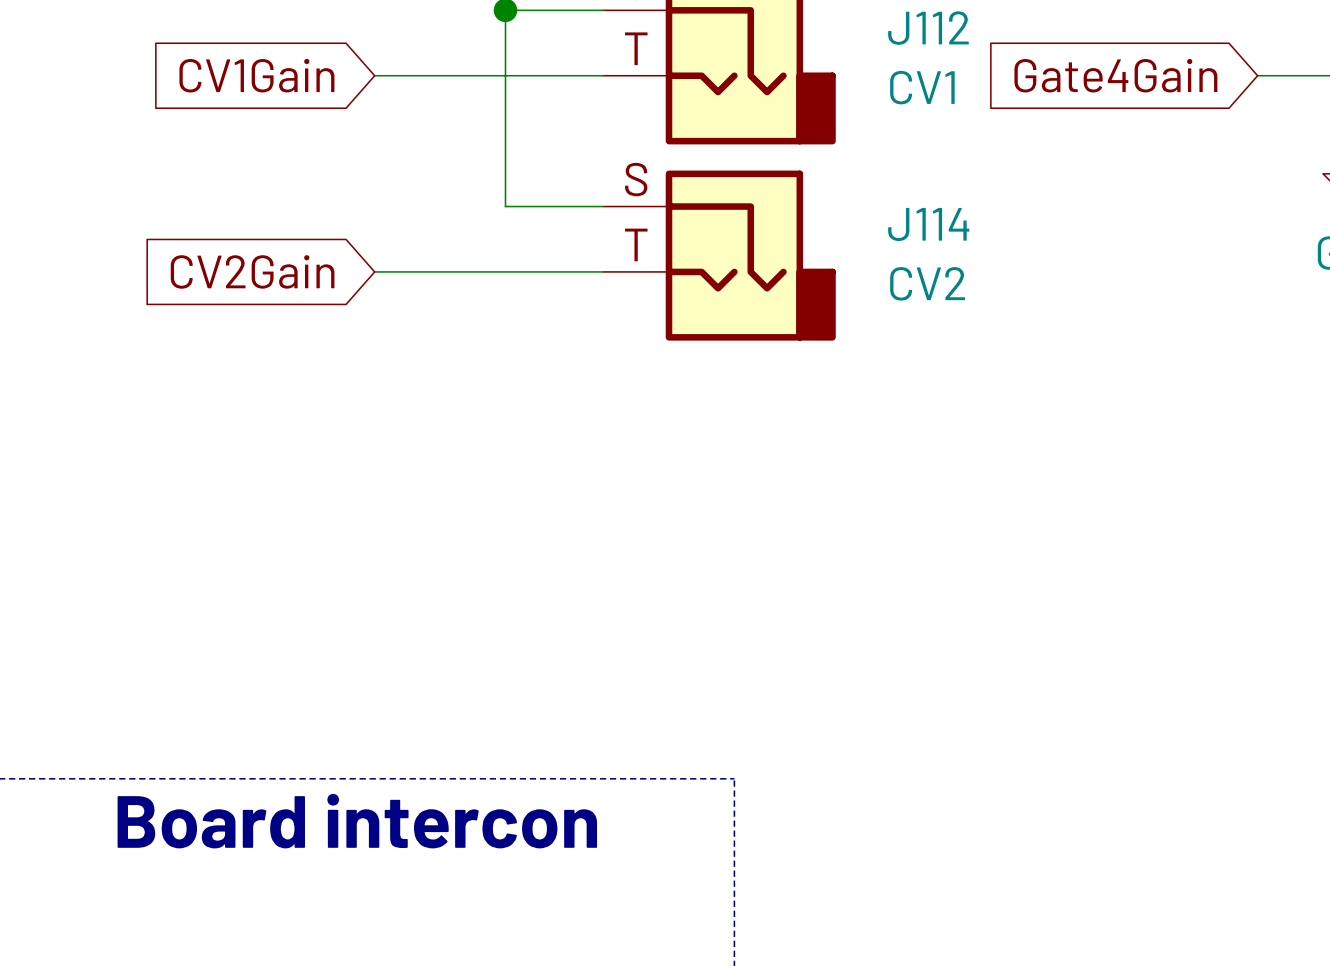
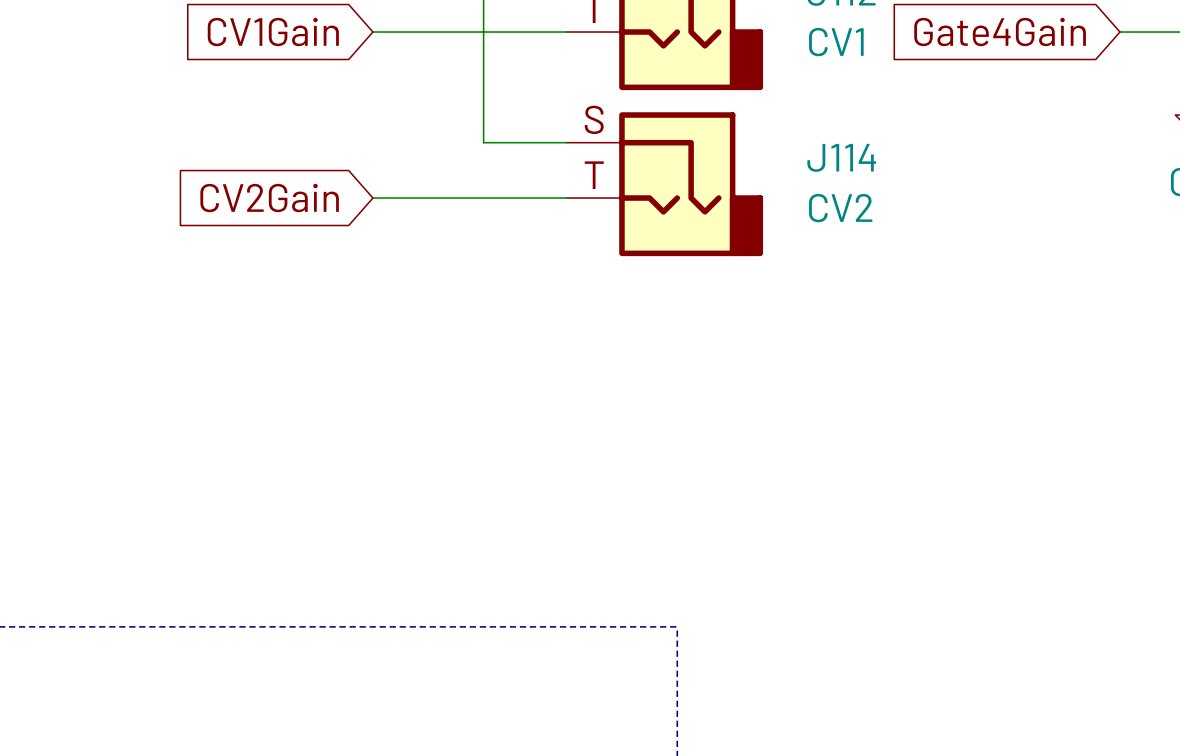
text: Board intercon (357, 821) -> none

